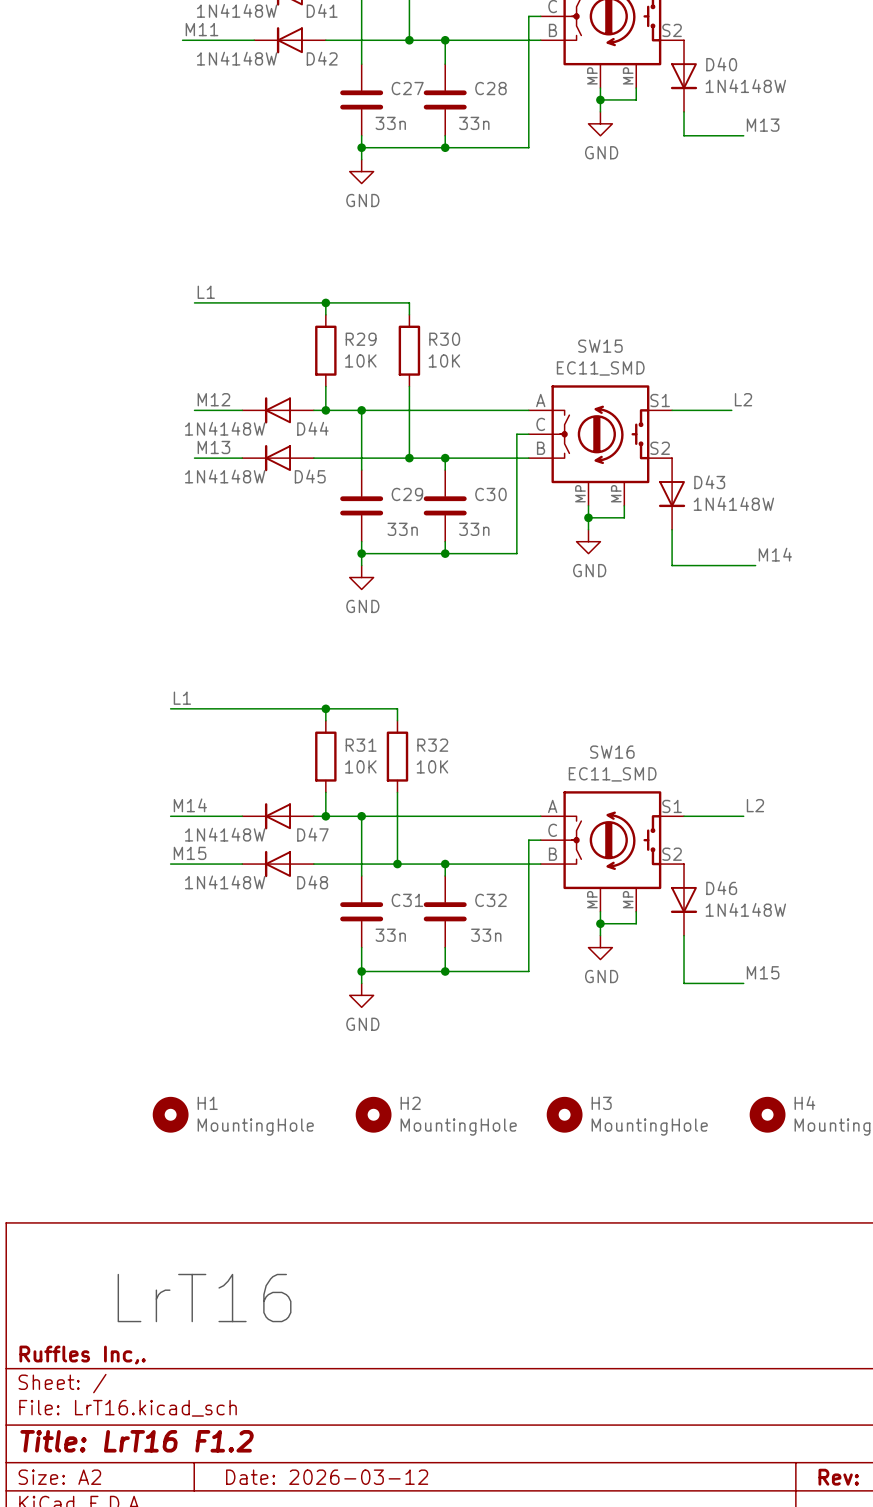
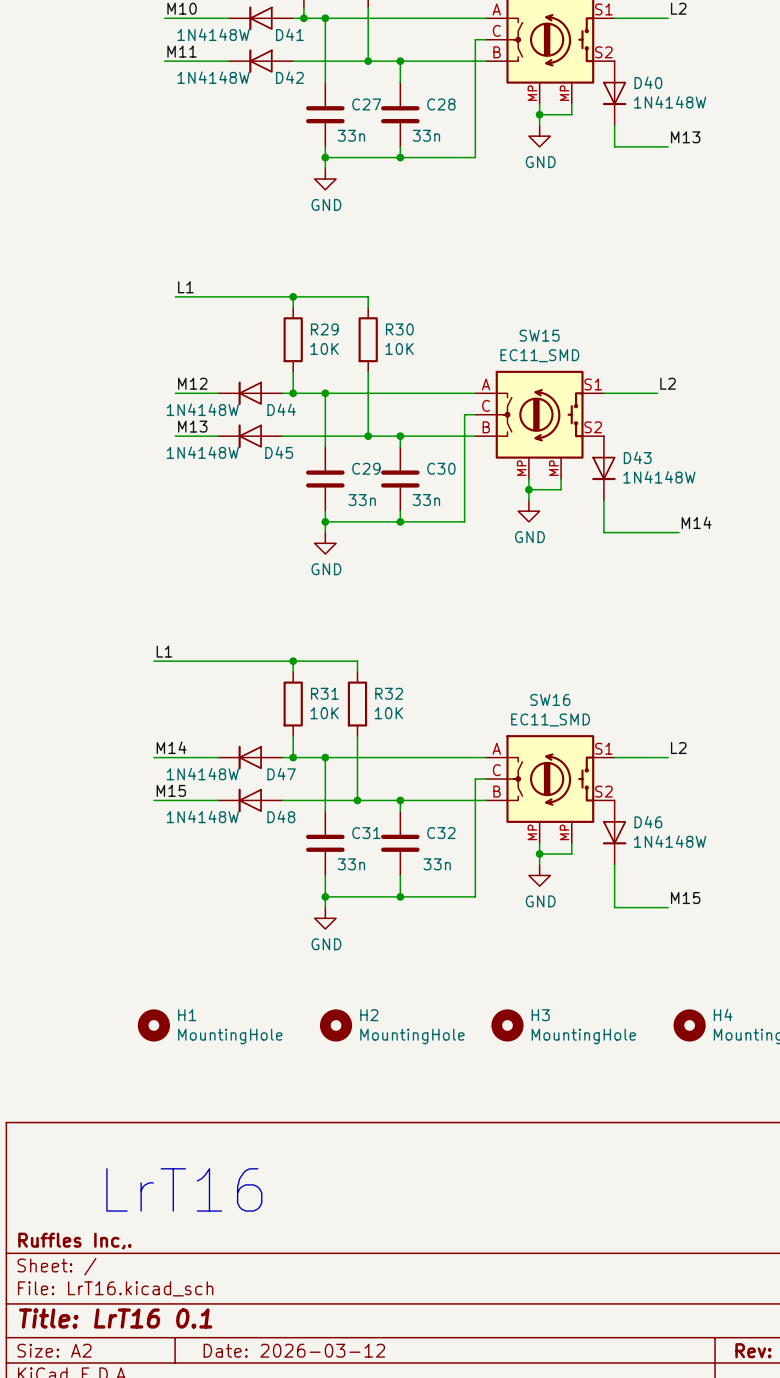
title block: Title: LrT16 F1.2 (137, 1441) -> Title: LrT16 0.1 (115, 1318)

